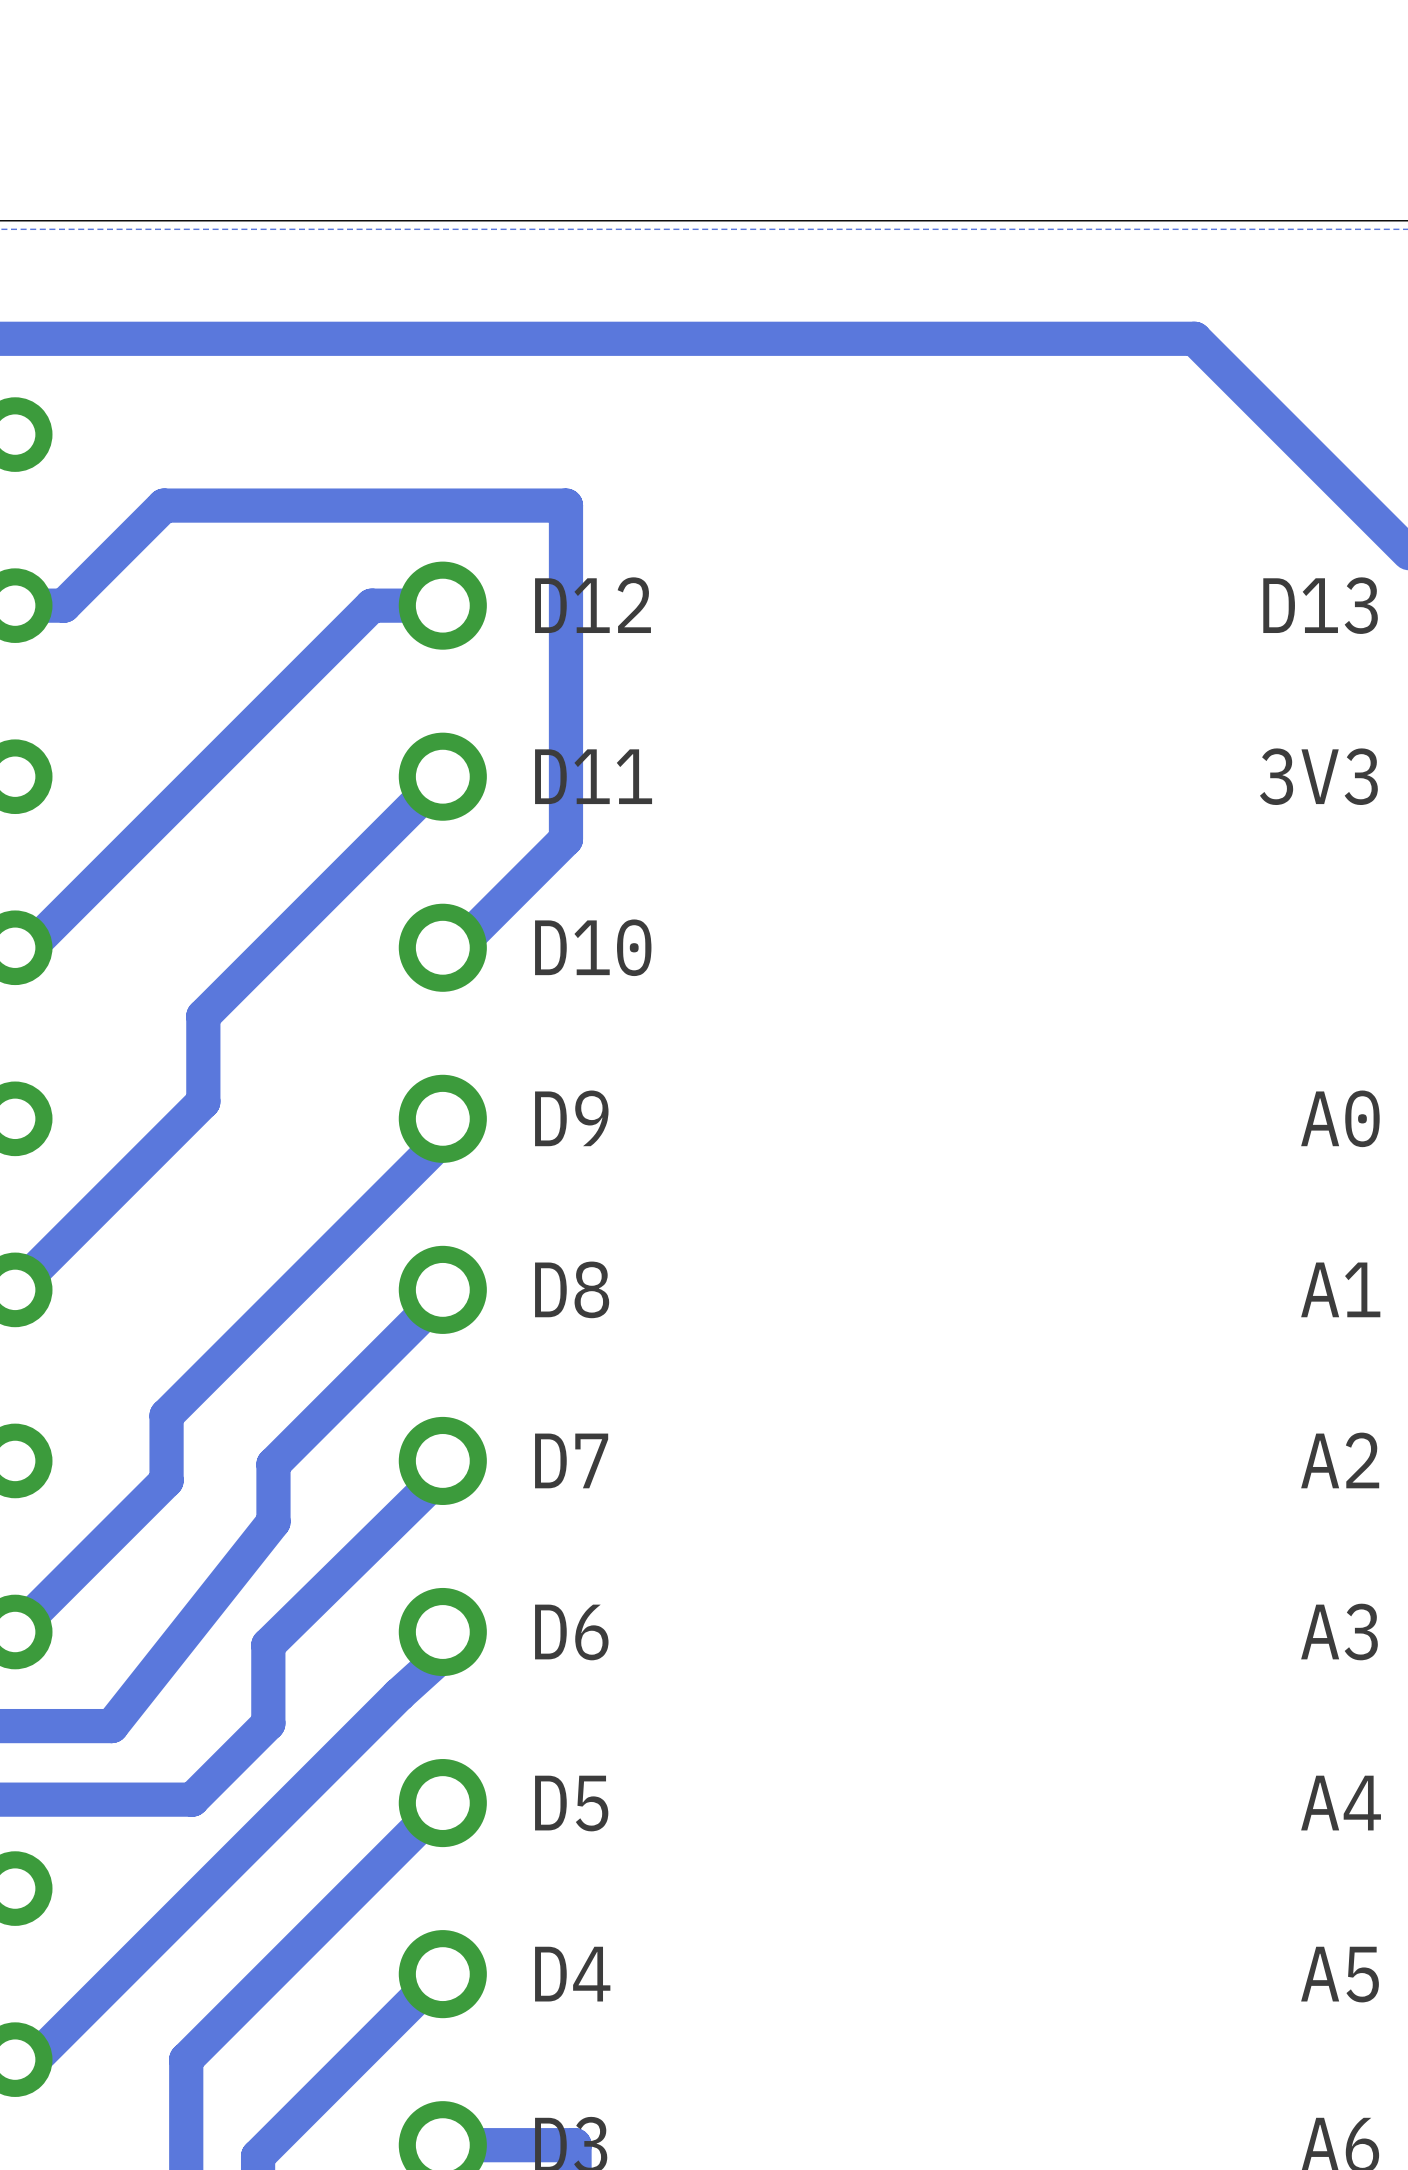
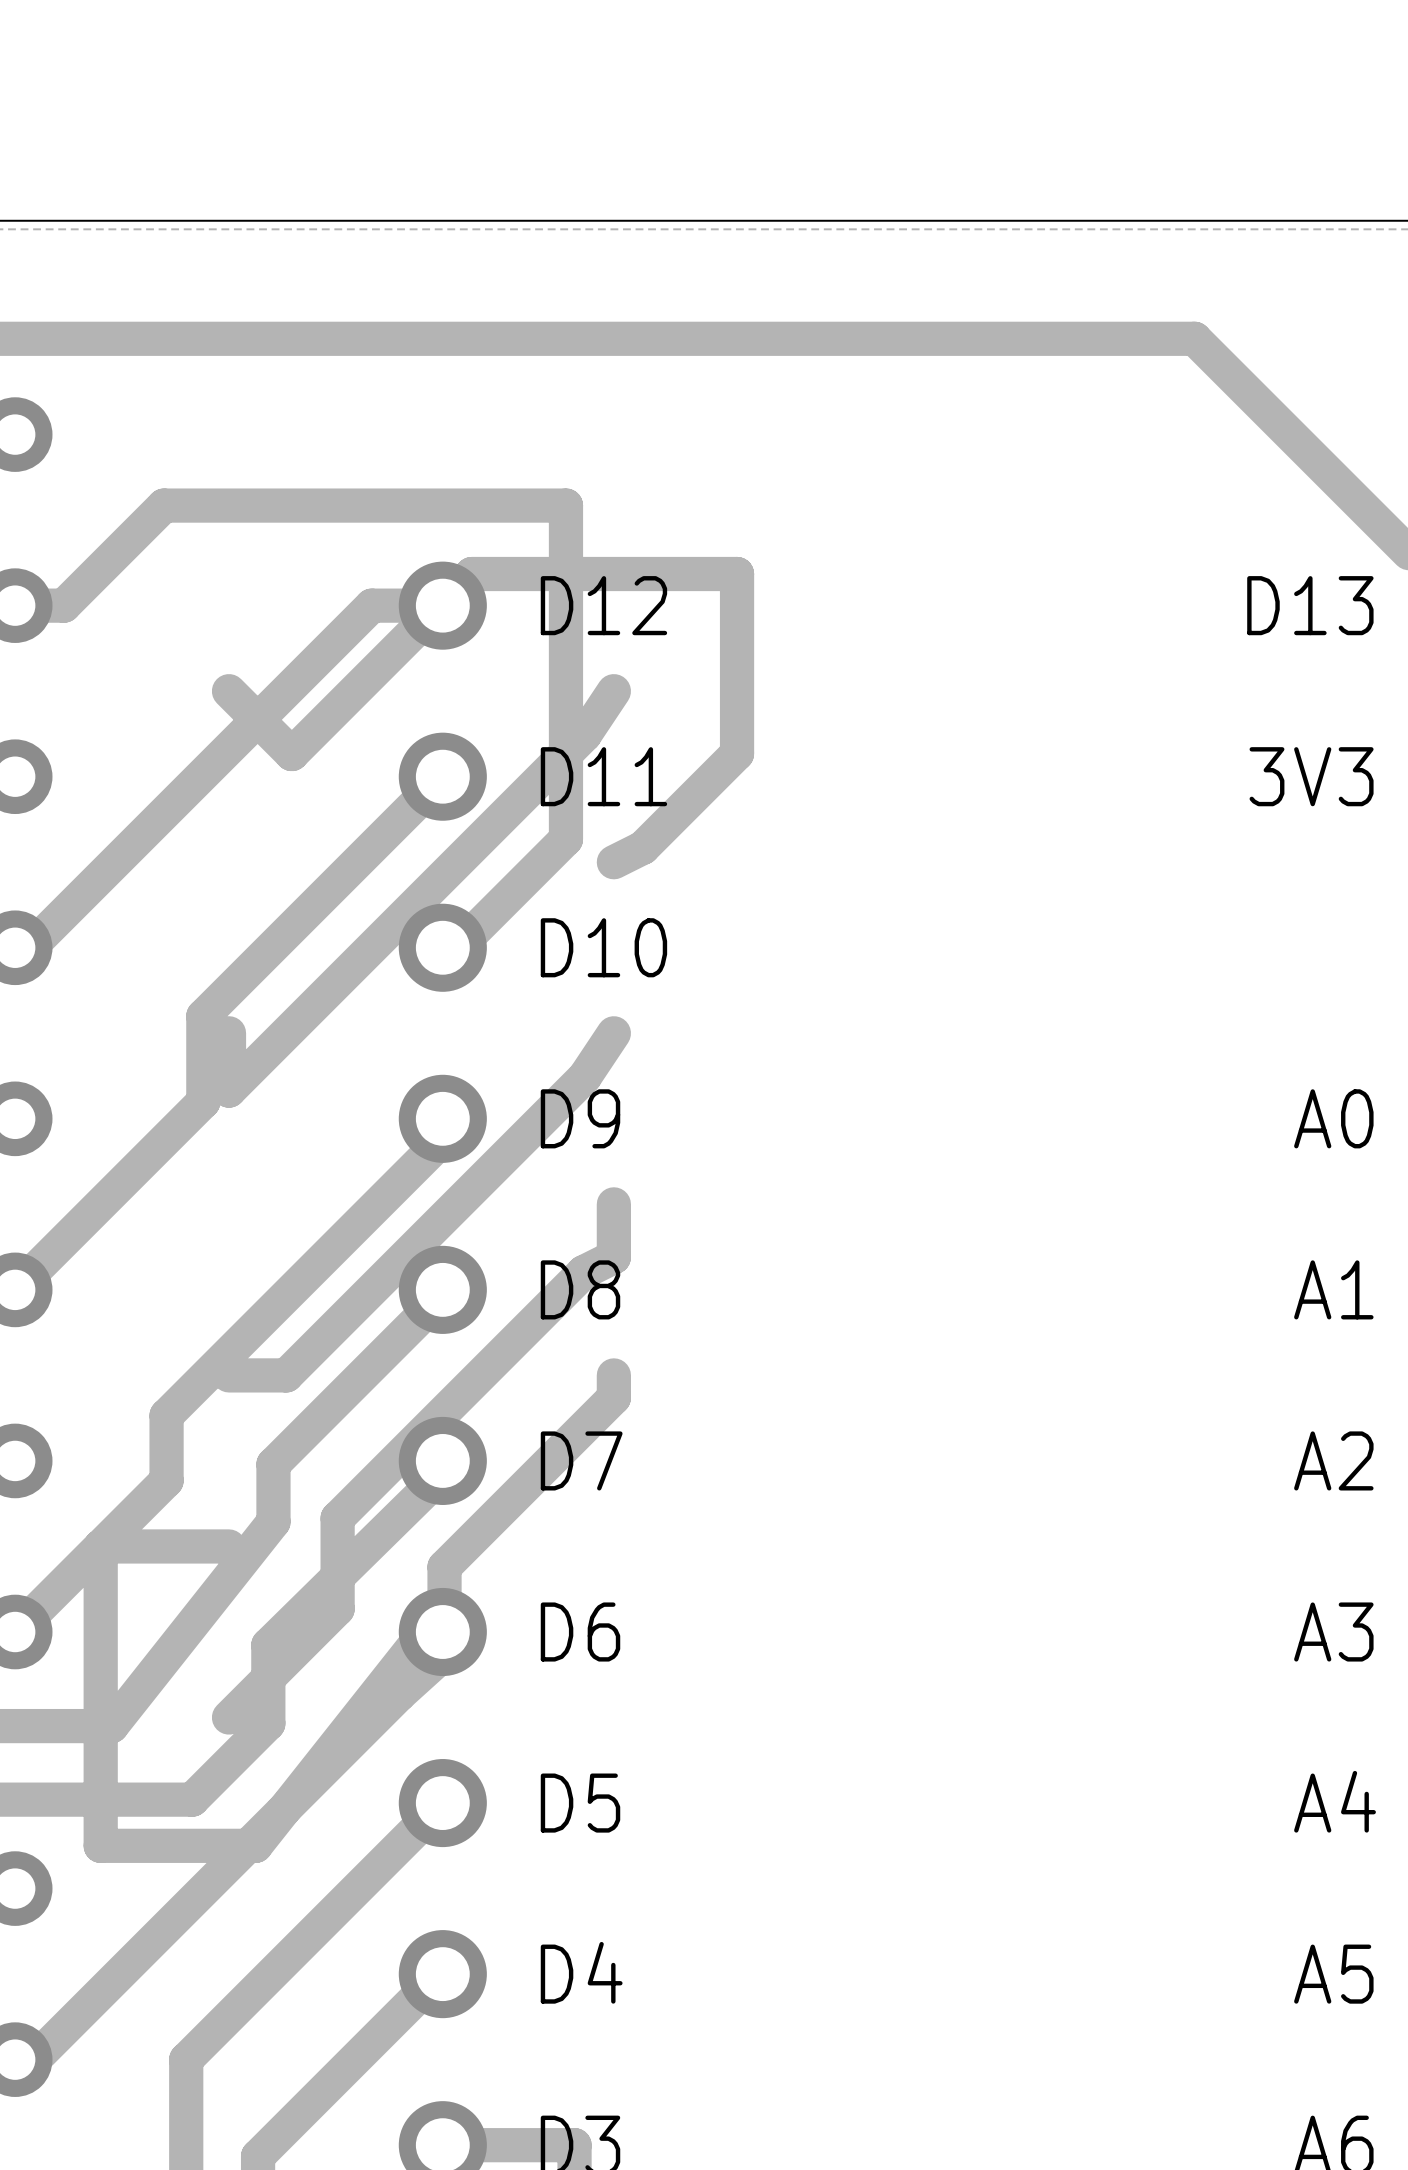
track: none -> (228, 691) (291, 754) (471, 574) (737, 574) (737, 753) (642, 847) (613, 862)
track: none -> (613, 691) (584, 734) (228, 1090) (228, 1033)
track: none -> (613, 1033) (584, 1076) (286, 1375) (228, 1375)
track: none -> (613, 1204) (613, 1257) (583, 1272) (337, 1518) (337, 1608) (228, 1717)
track: none -> (613, 1375) (613, 1397) (444, 1567) (444, 1607) (255, 1845) (100, 1845) (100, 1546) (228, 1546)

